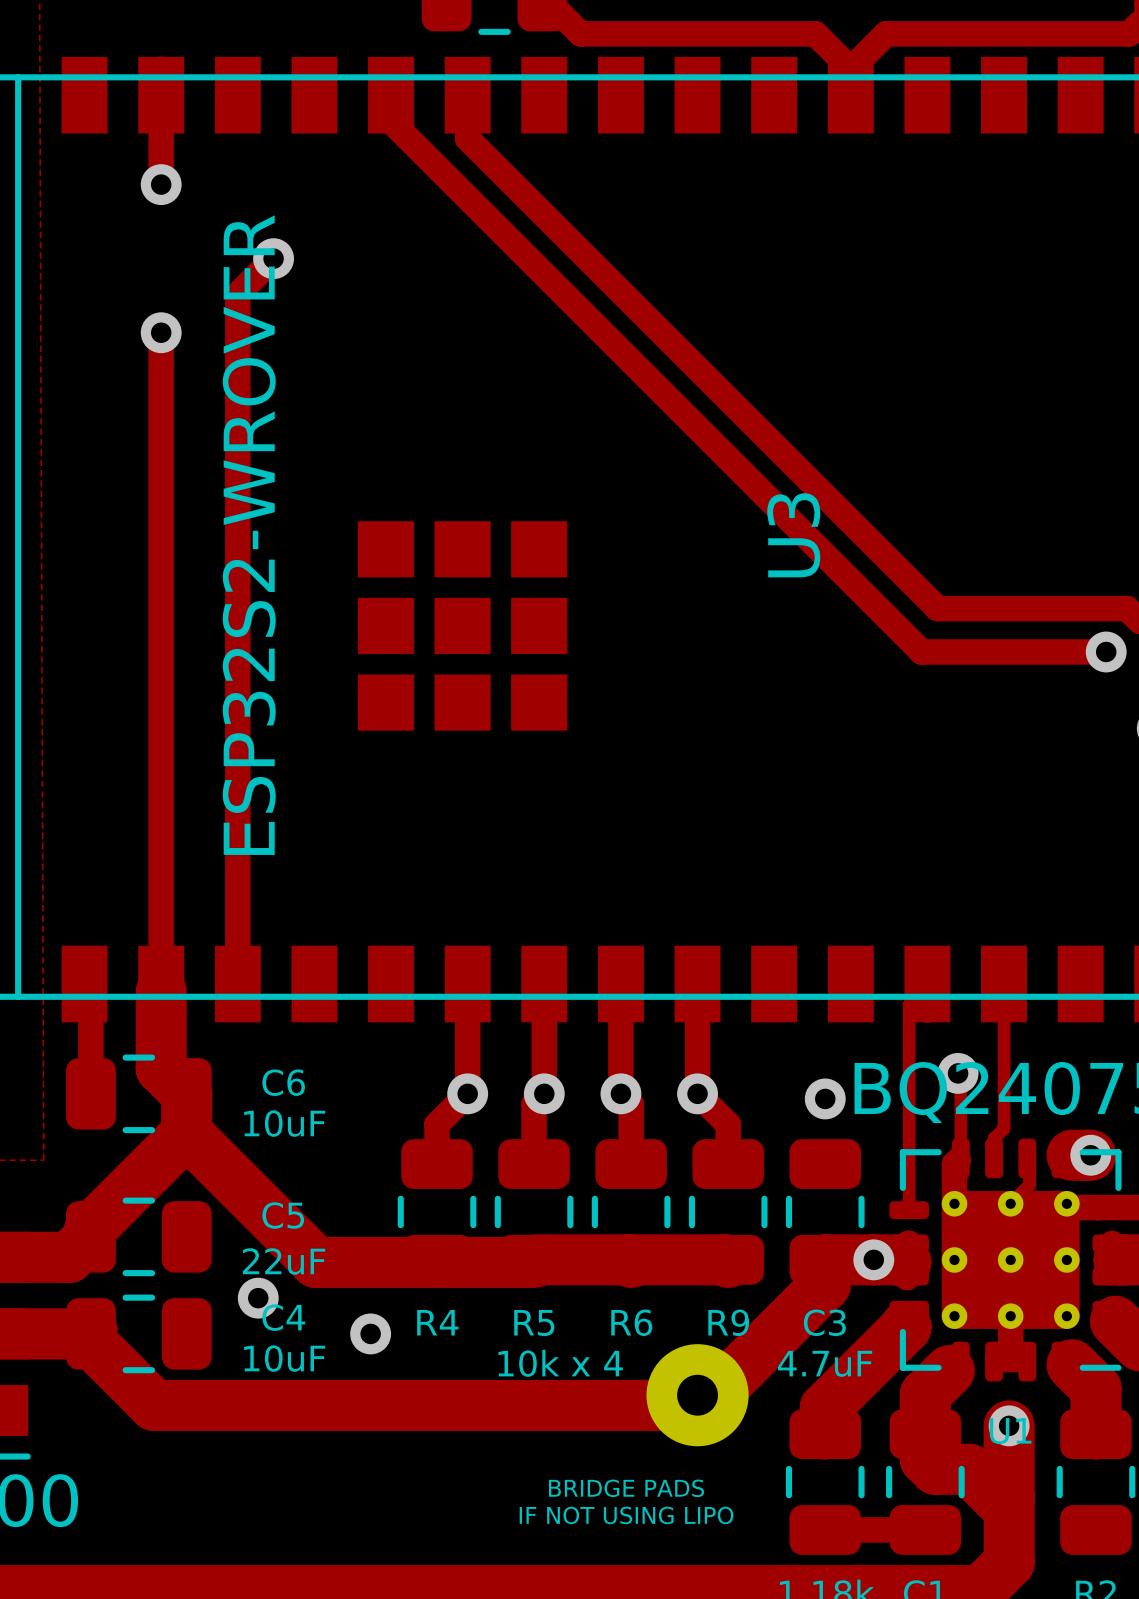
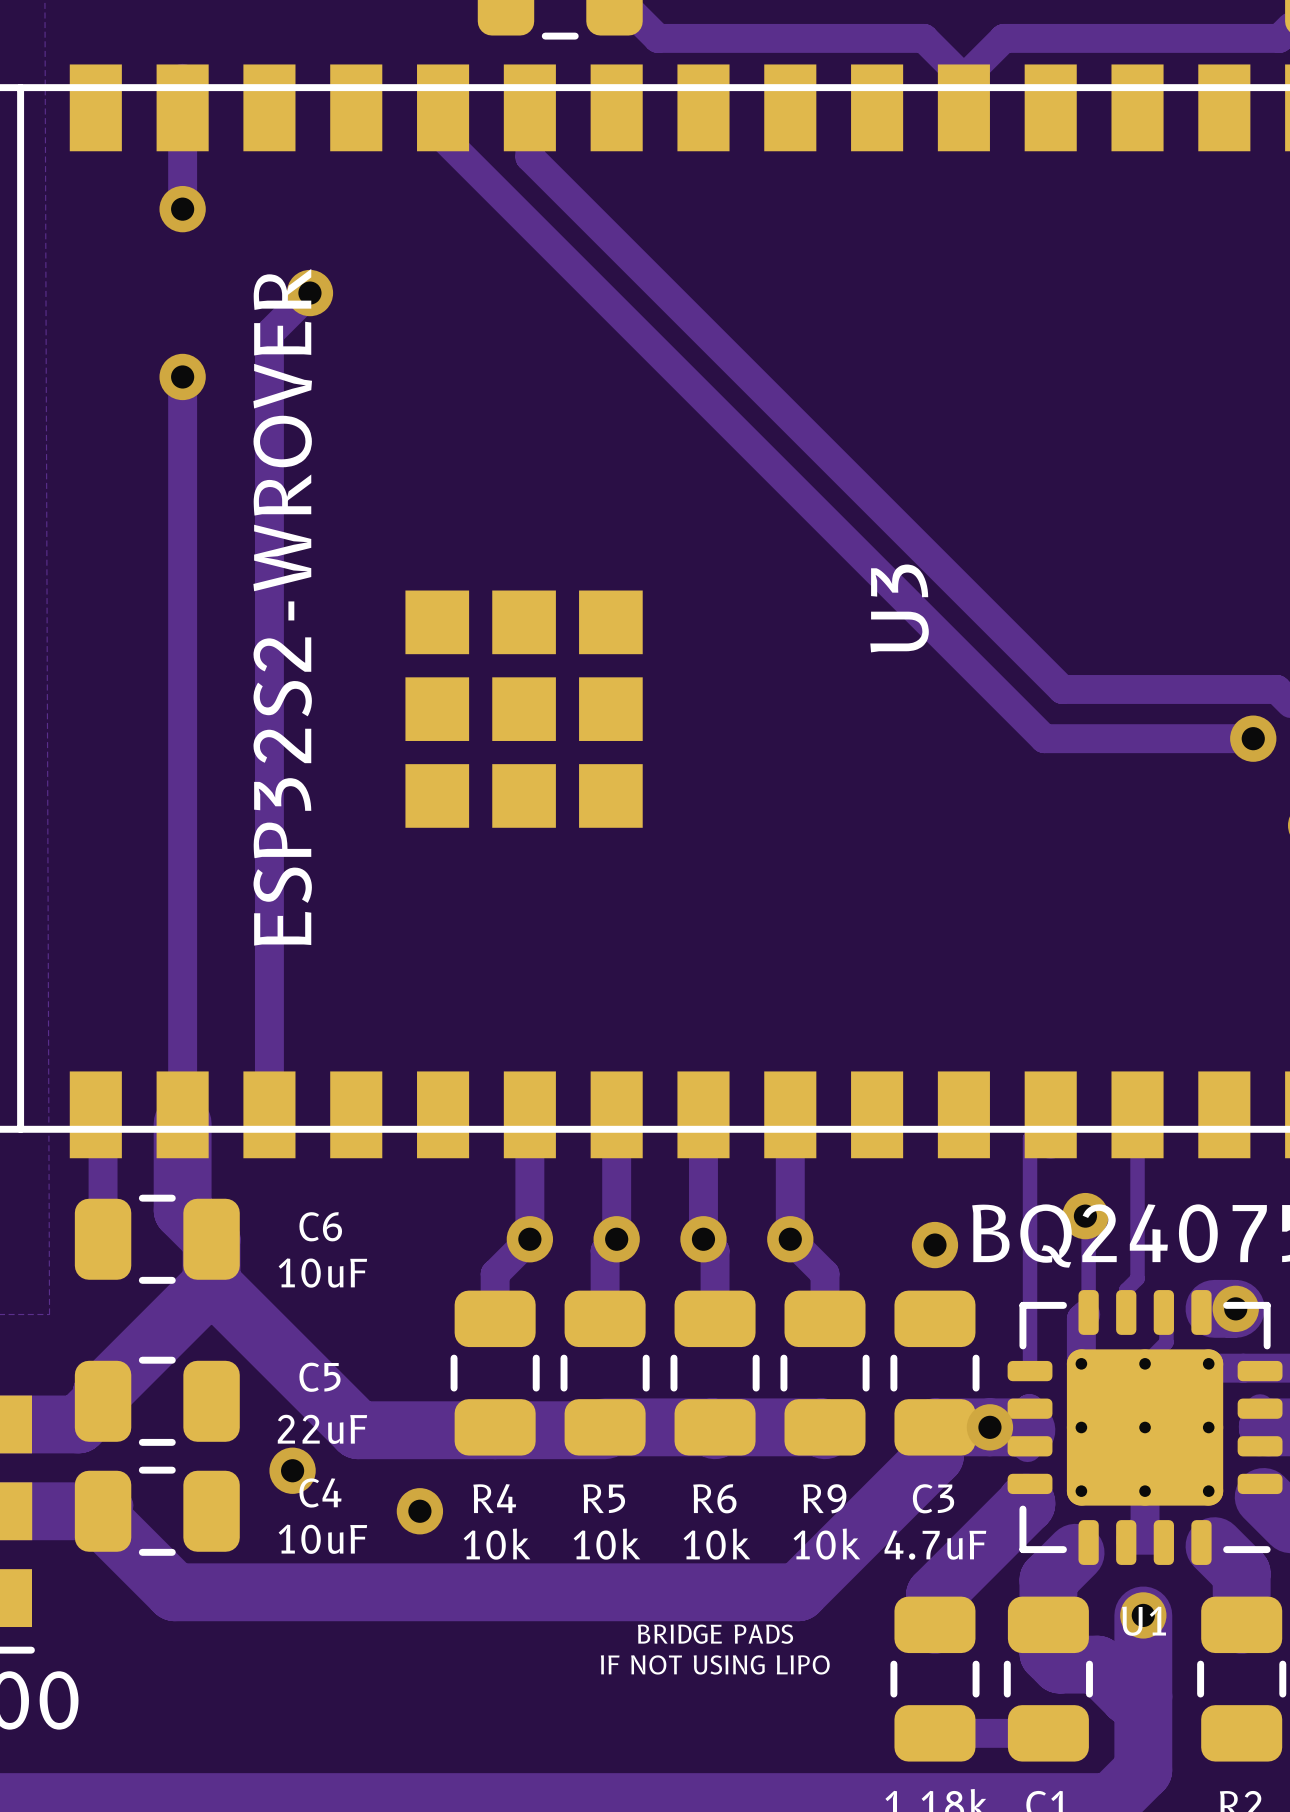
R4 value: none -> 10k (497, 1544)
R5 value: 10k x 4 (560, 1363) -> 10k (606, 1544)
R6 value: none -> 10k (716, 1544)
R9 value: none -> 10k (826, 1544)
part: (697, 1395) -> none
text position: BRIDGE PADS (626, 1488) -> BRIDGE PADS (715, 1634)
text position: IF NOT USING LIPO (626, 1515) -> IF NOT USING LIPO (715, 1664)

